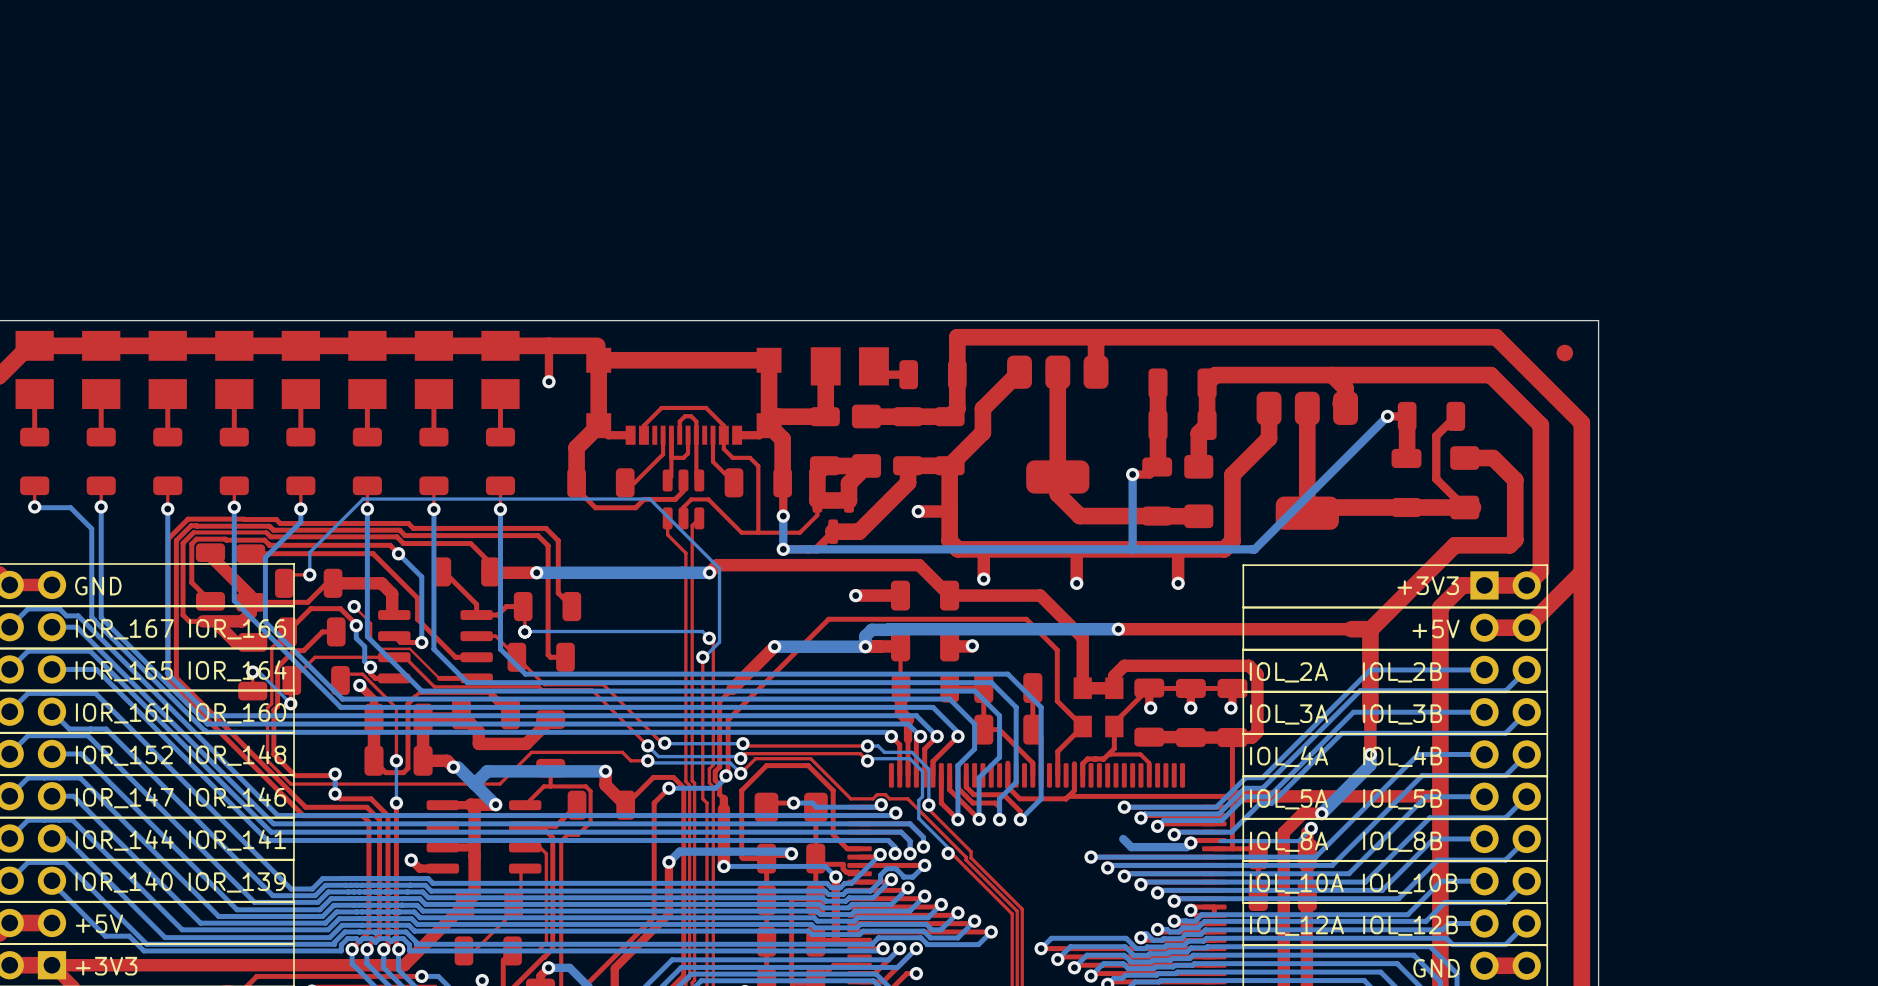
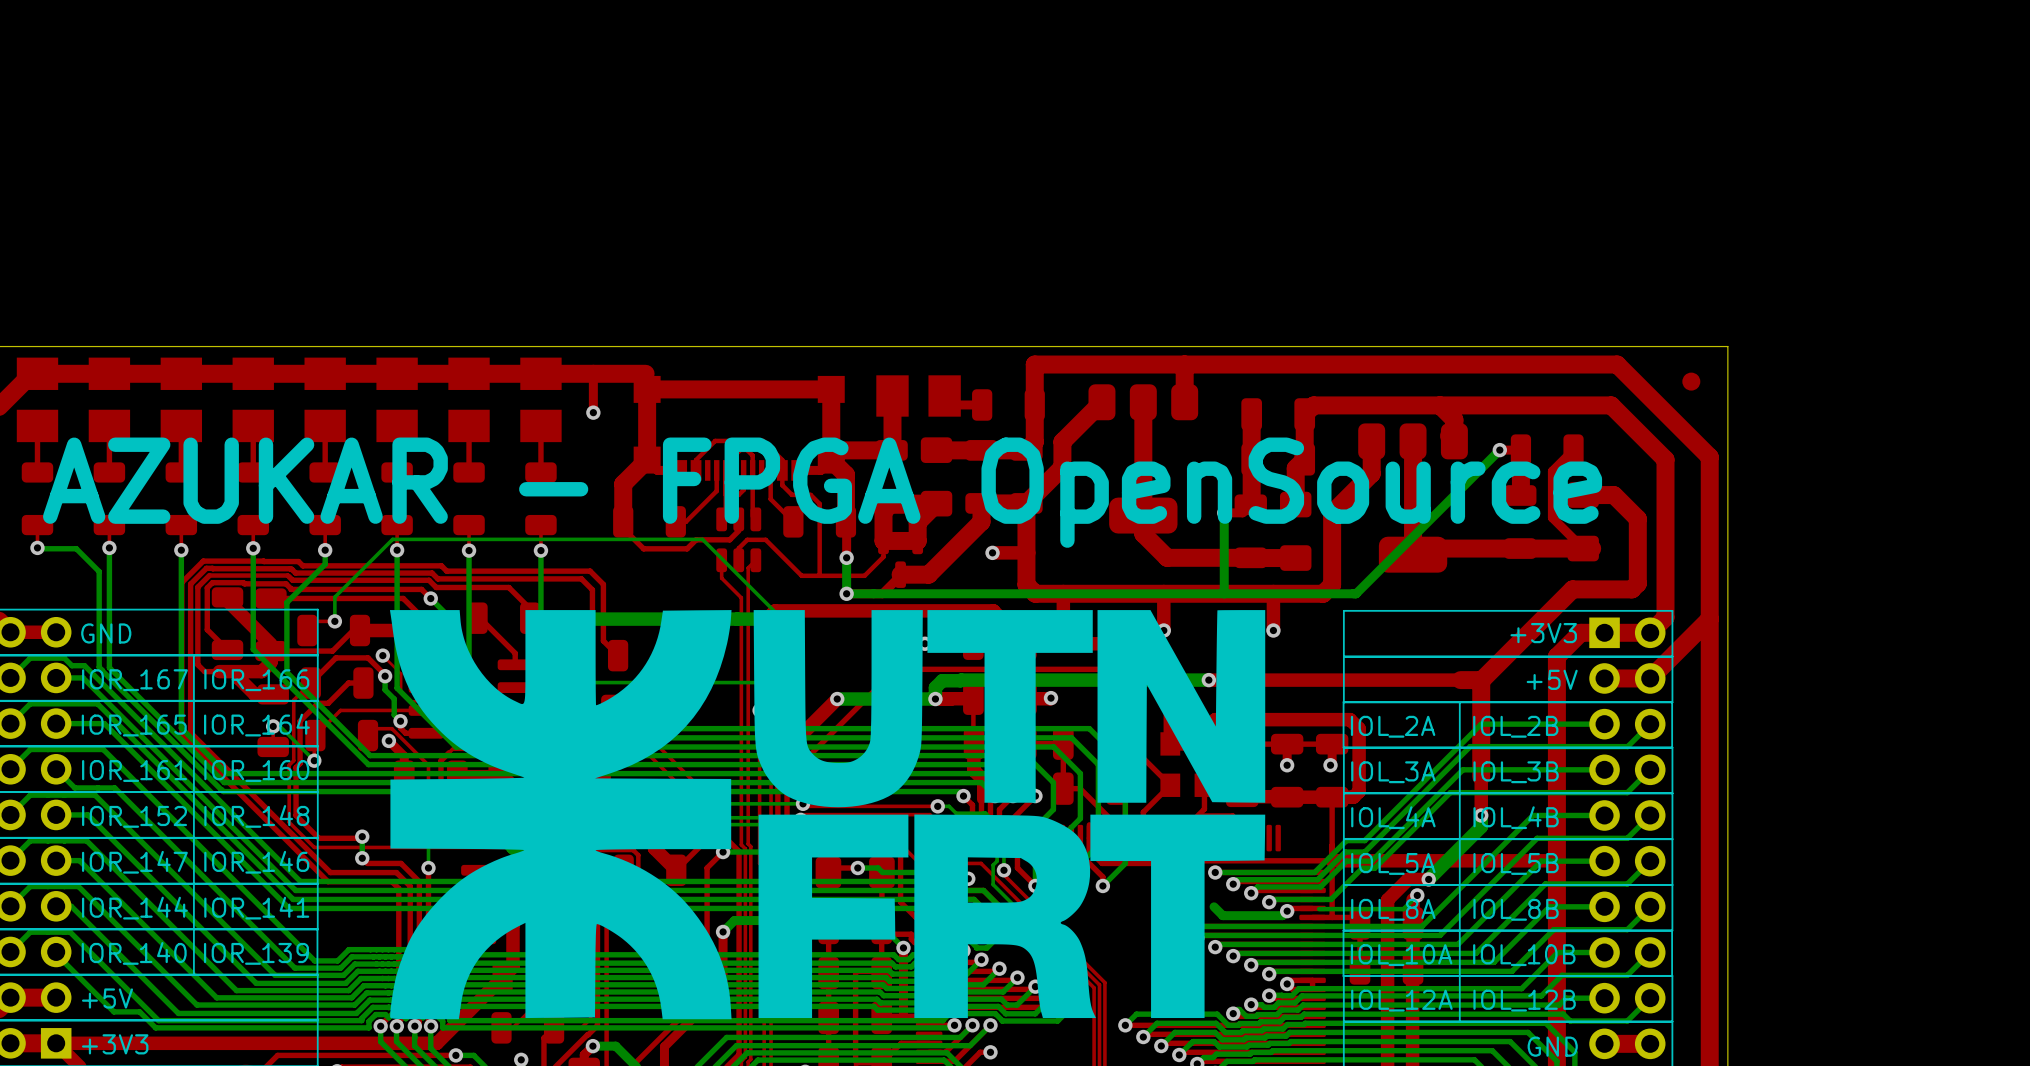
text: none -> AZUKAR - FPGA OpenSource (822, 492)
drawing: none -> [389, 610, 732, 1020]
drawing: none -> [753, 610, 1266, 1019]
line: none -> (193, 654) (193, 973)
line: none -> (1459, 702) (1459, 1020)

